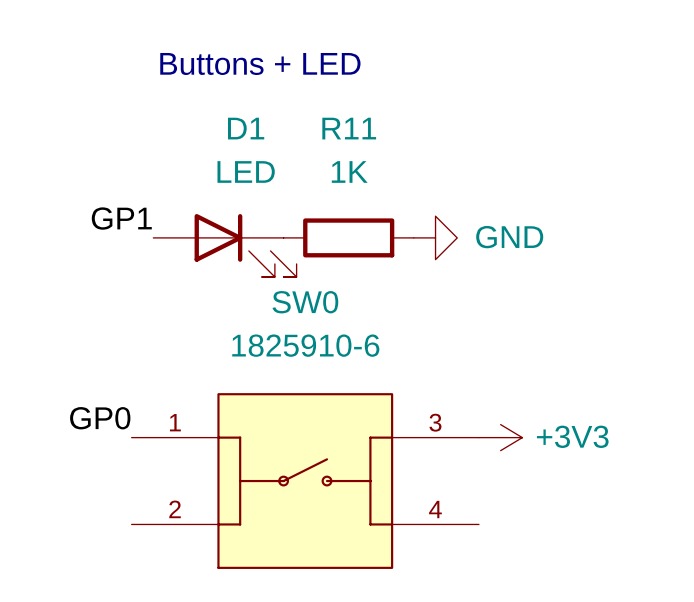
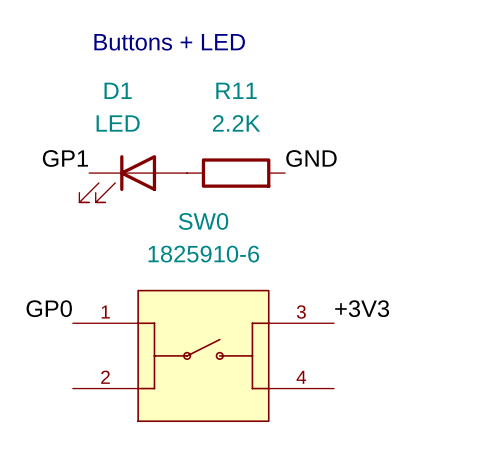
R11 value: 1K (349, 171) -> 2.2K (236, 123)
label: none -> GND (311, 158)
power symbol: GND (435, 237) -> none
D1 flip: as is (245, 245) -> left-right (117, 178)
label: none -> +3V3 (362, 308)
power symbol: +3V3 (500, 437) -> none

